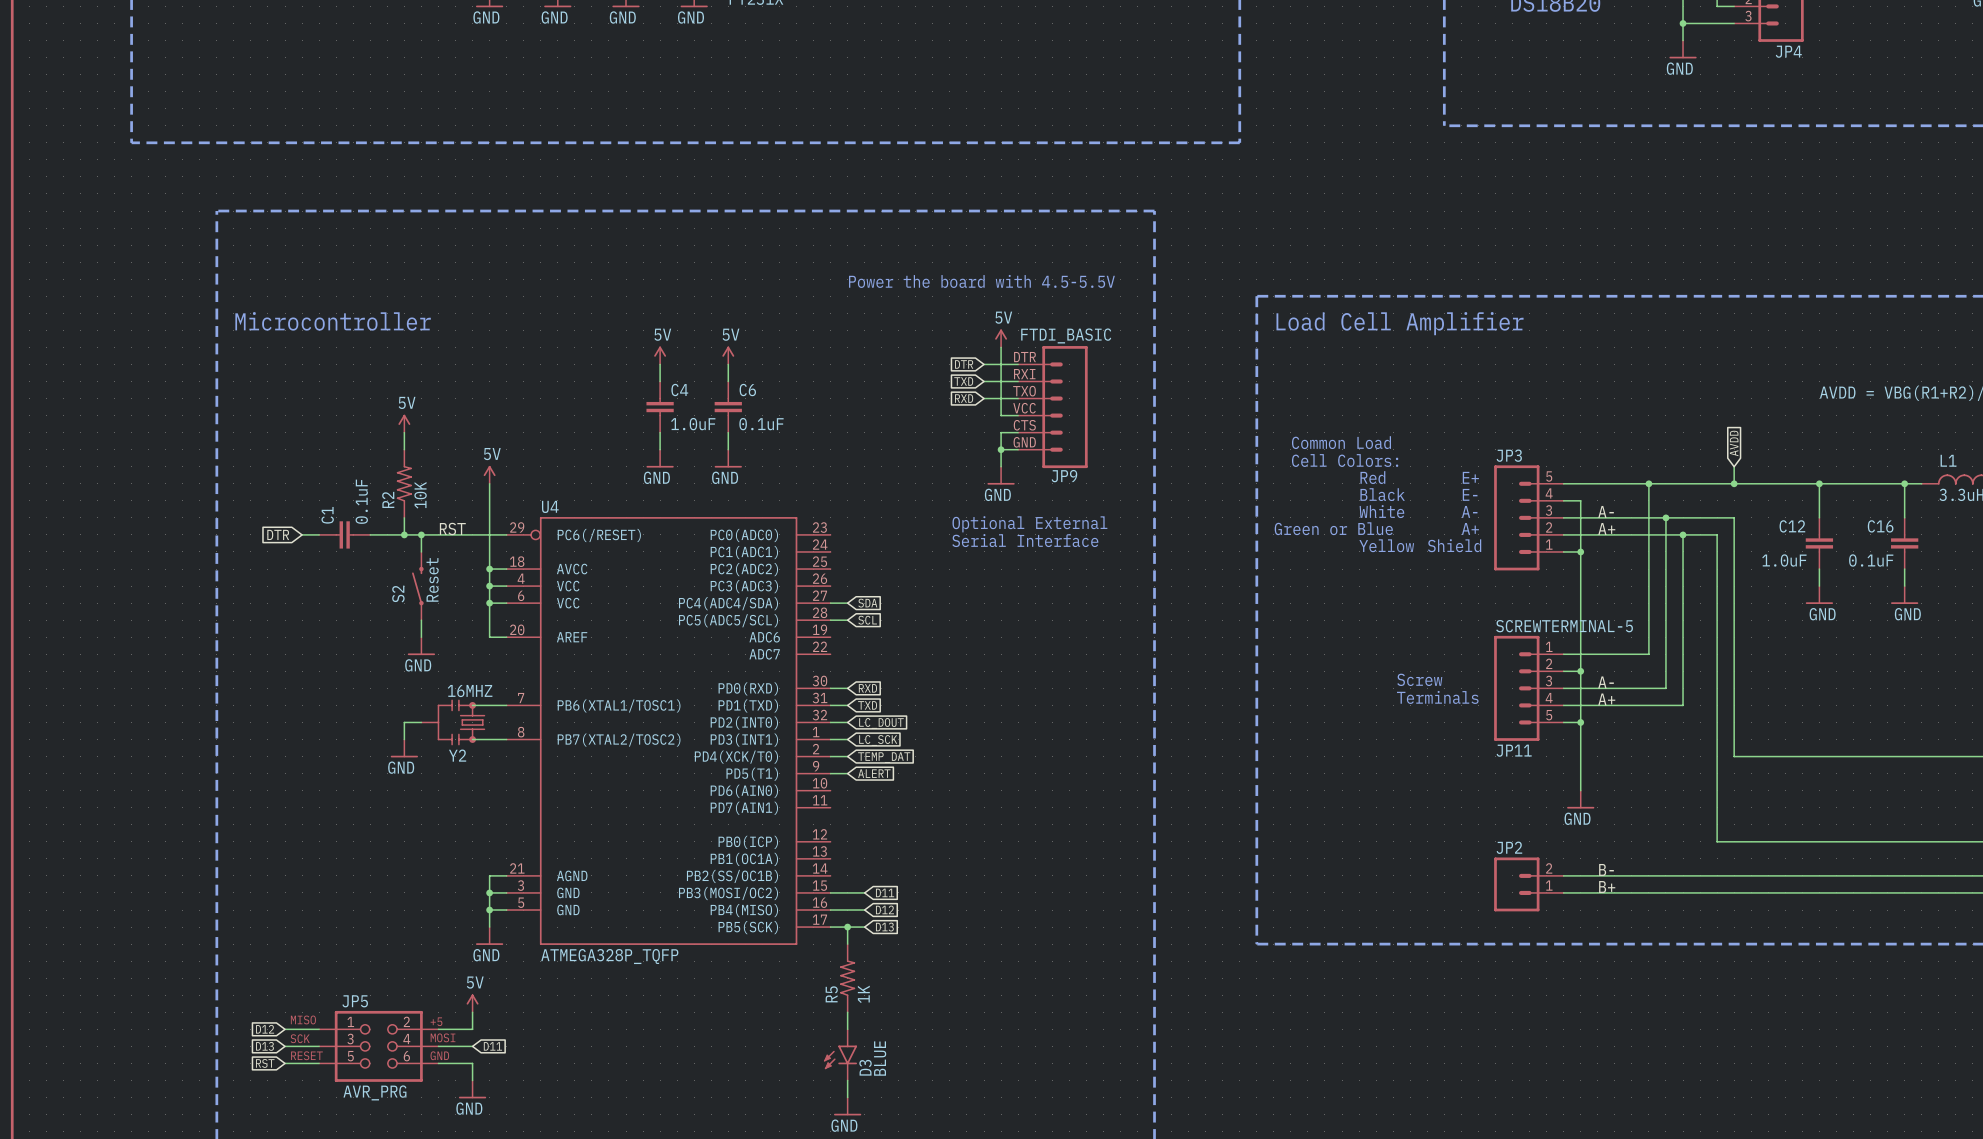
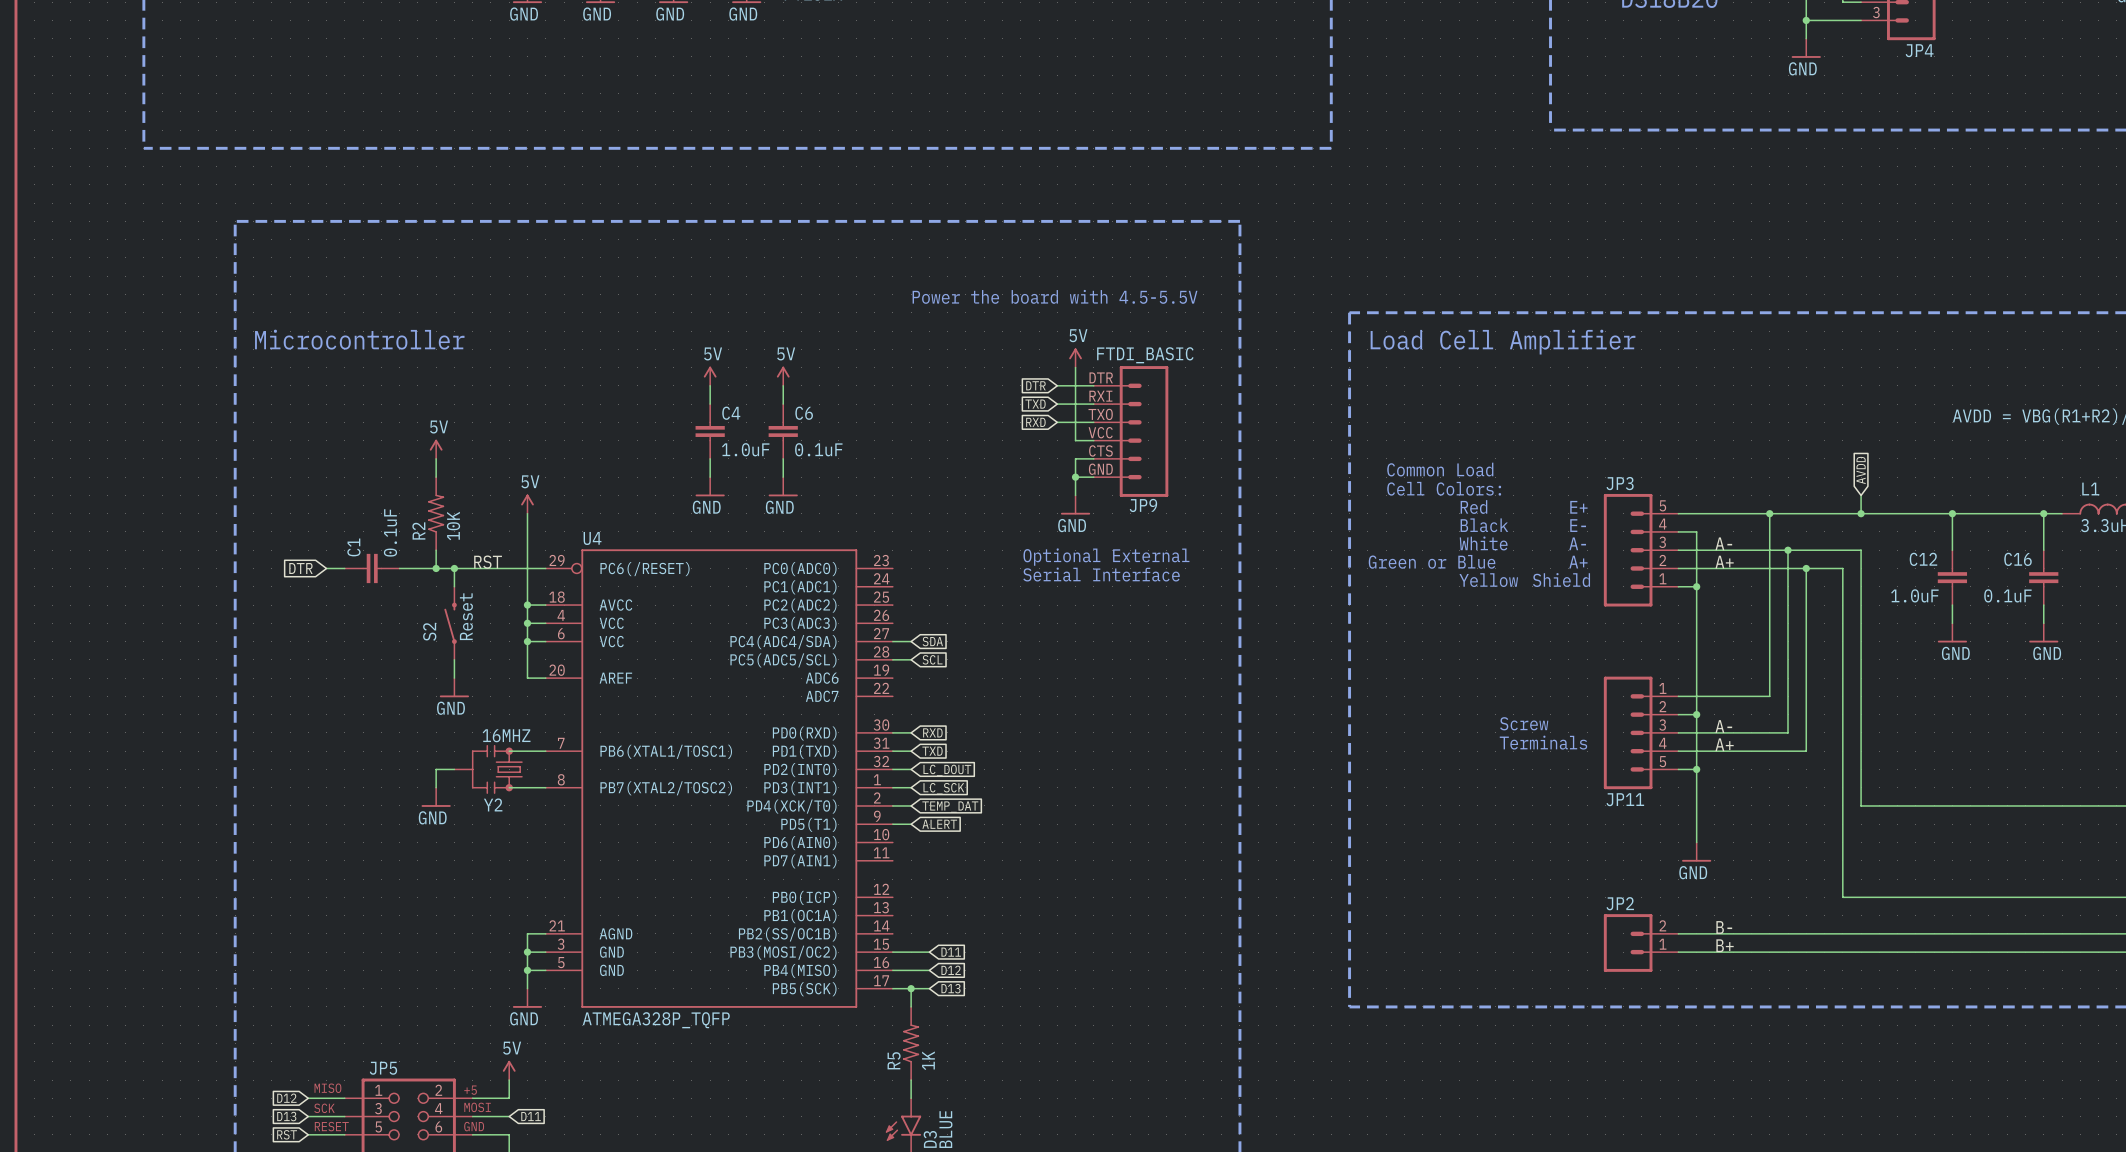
JP11 value: SCREWTERMINAL-5 (1564, 626) -> none

